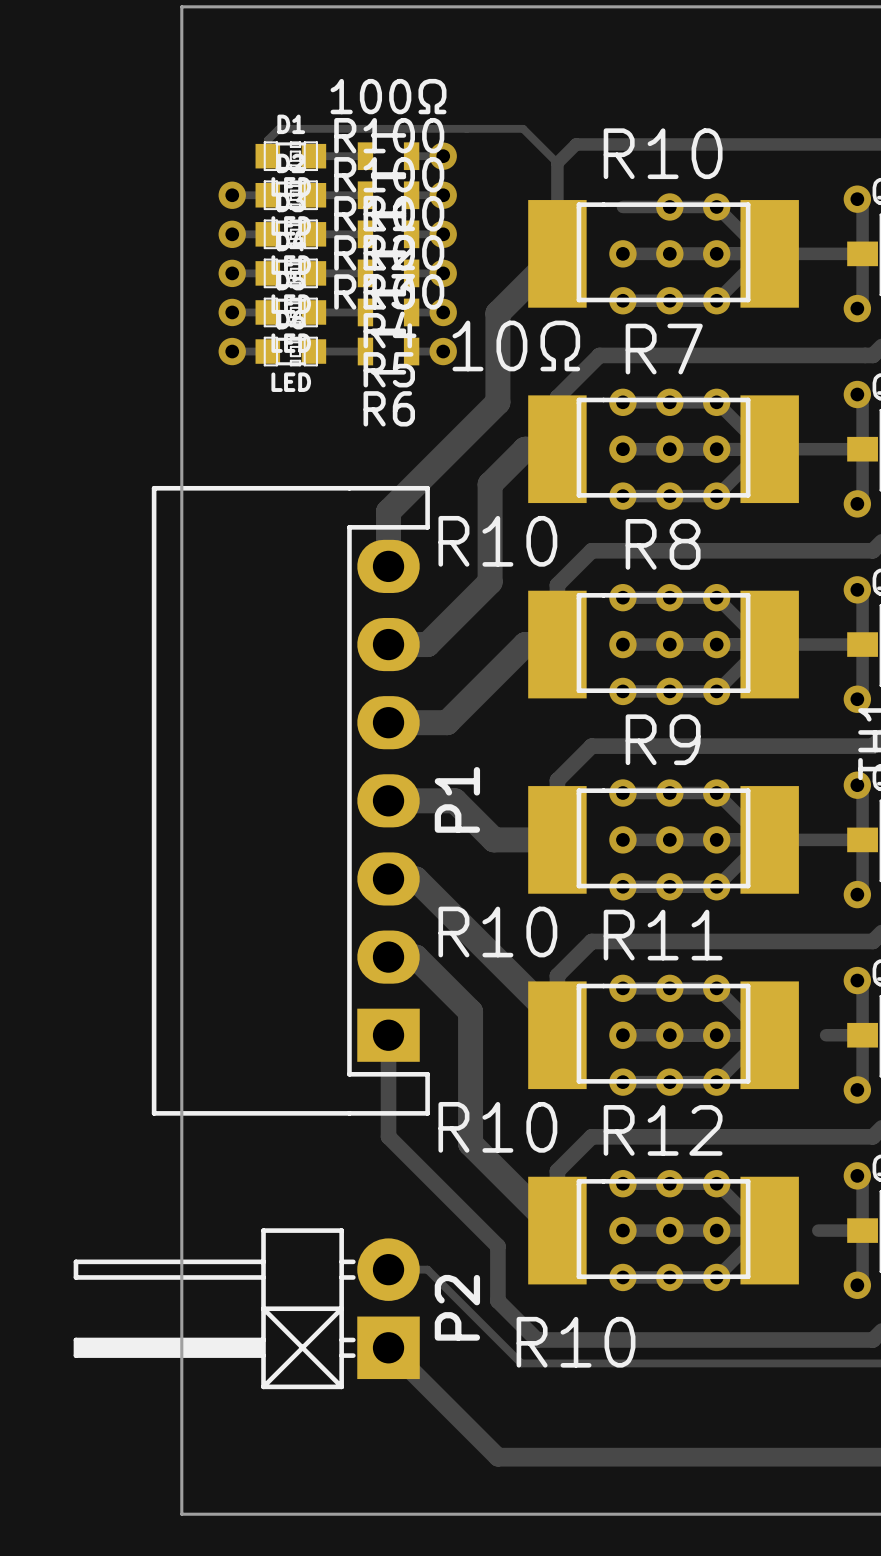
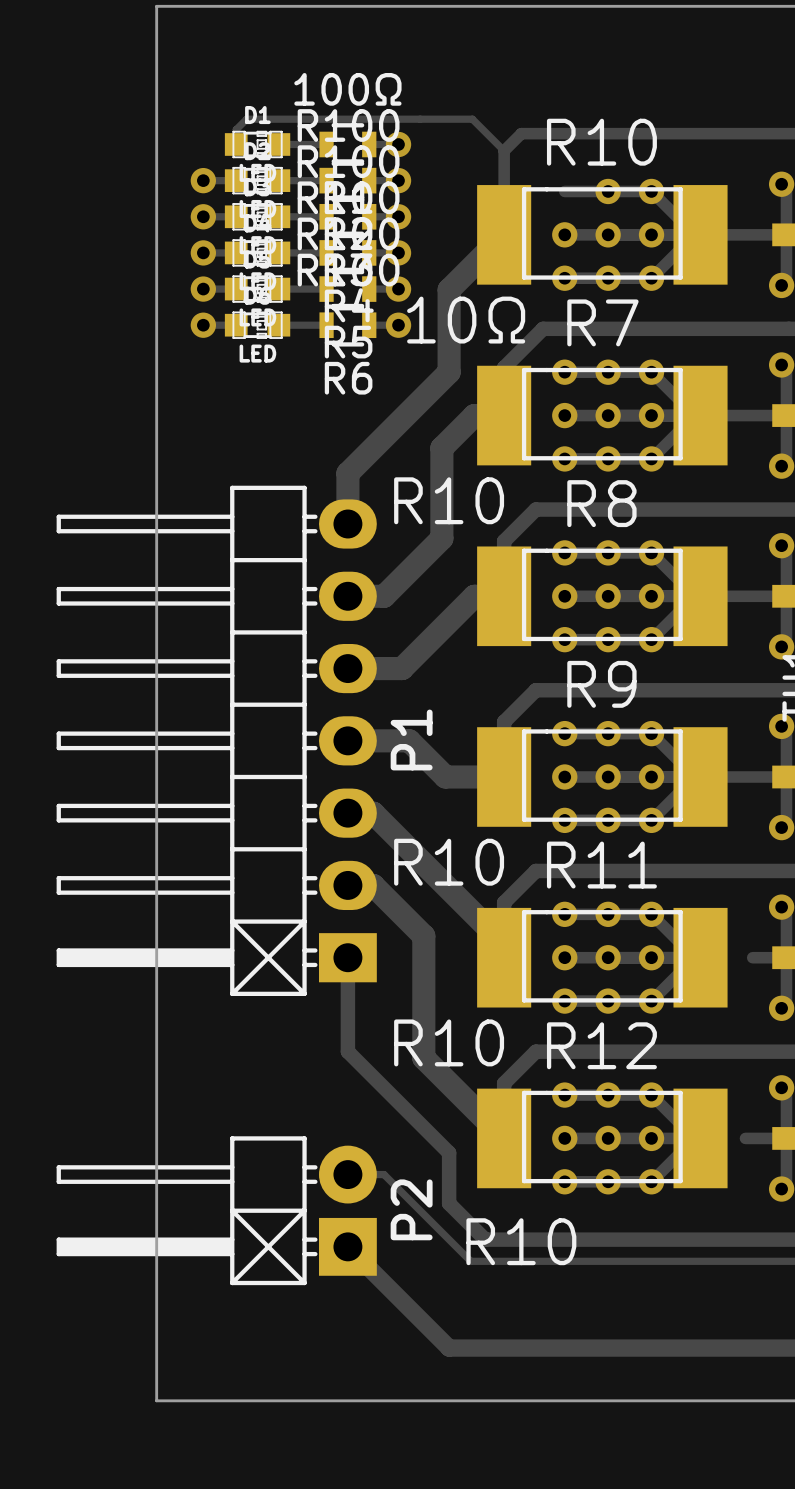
P1 footprint: [151, 485, 430, 1116] -> [56, 485, 377, 996]

